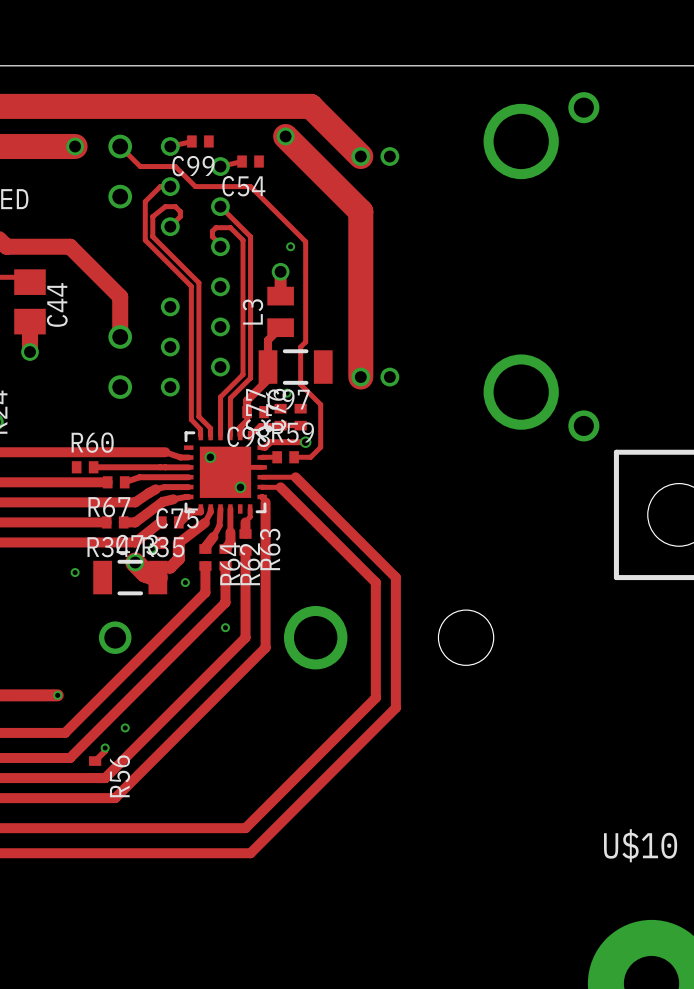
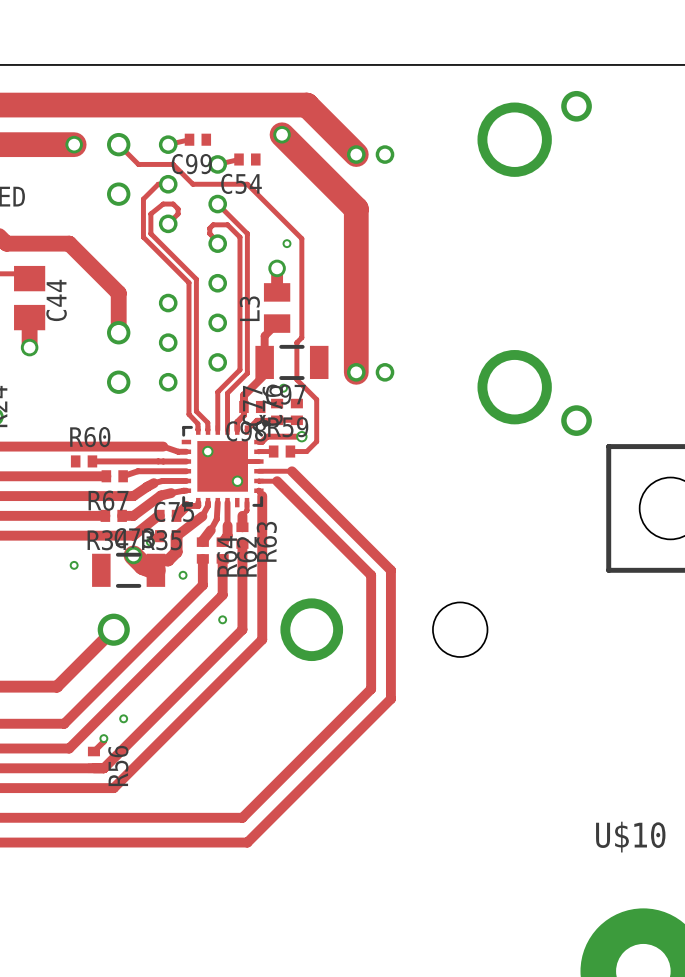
track: none -> (113, 629) (56, 686)
via: (57, 695) -> none

